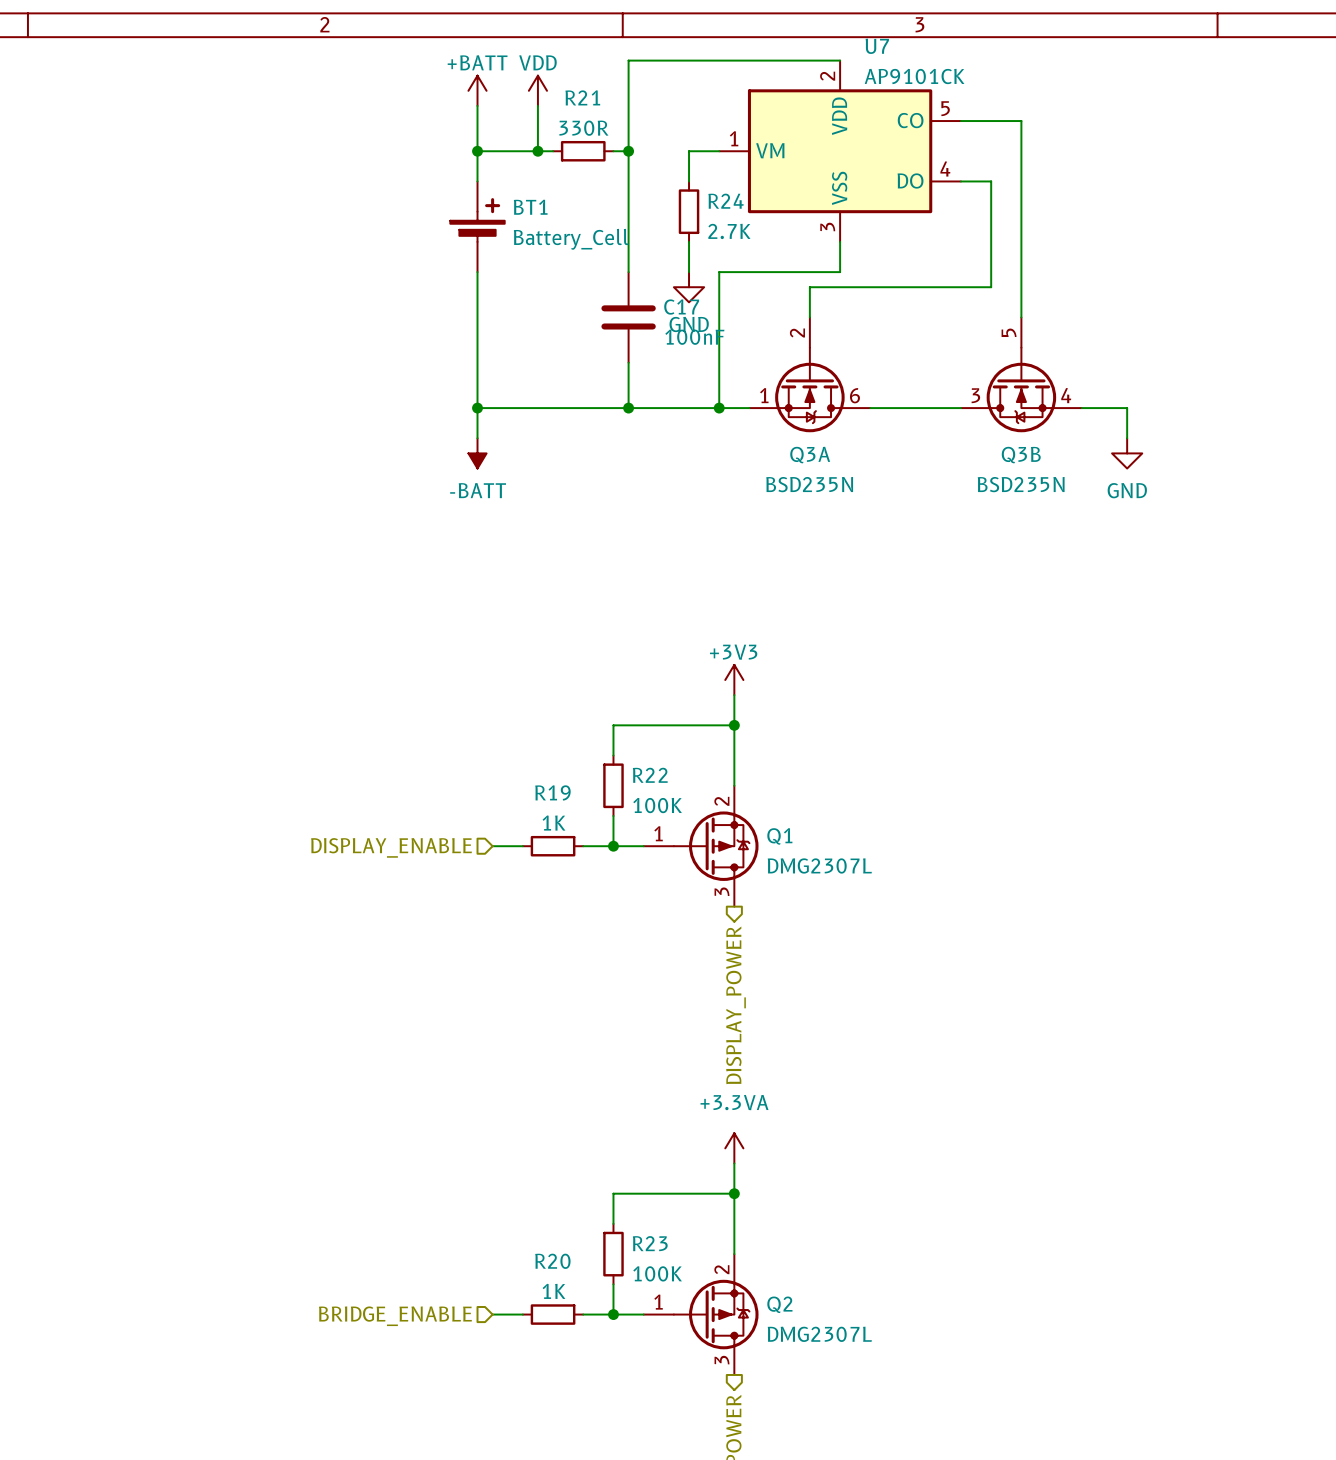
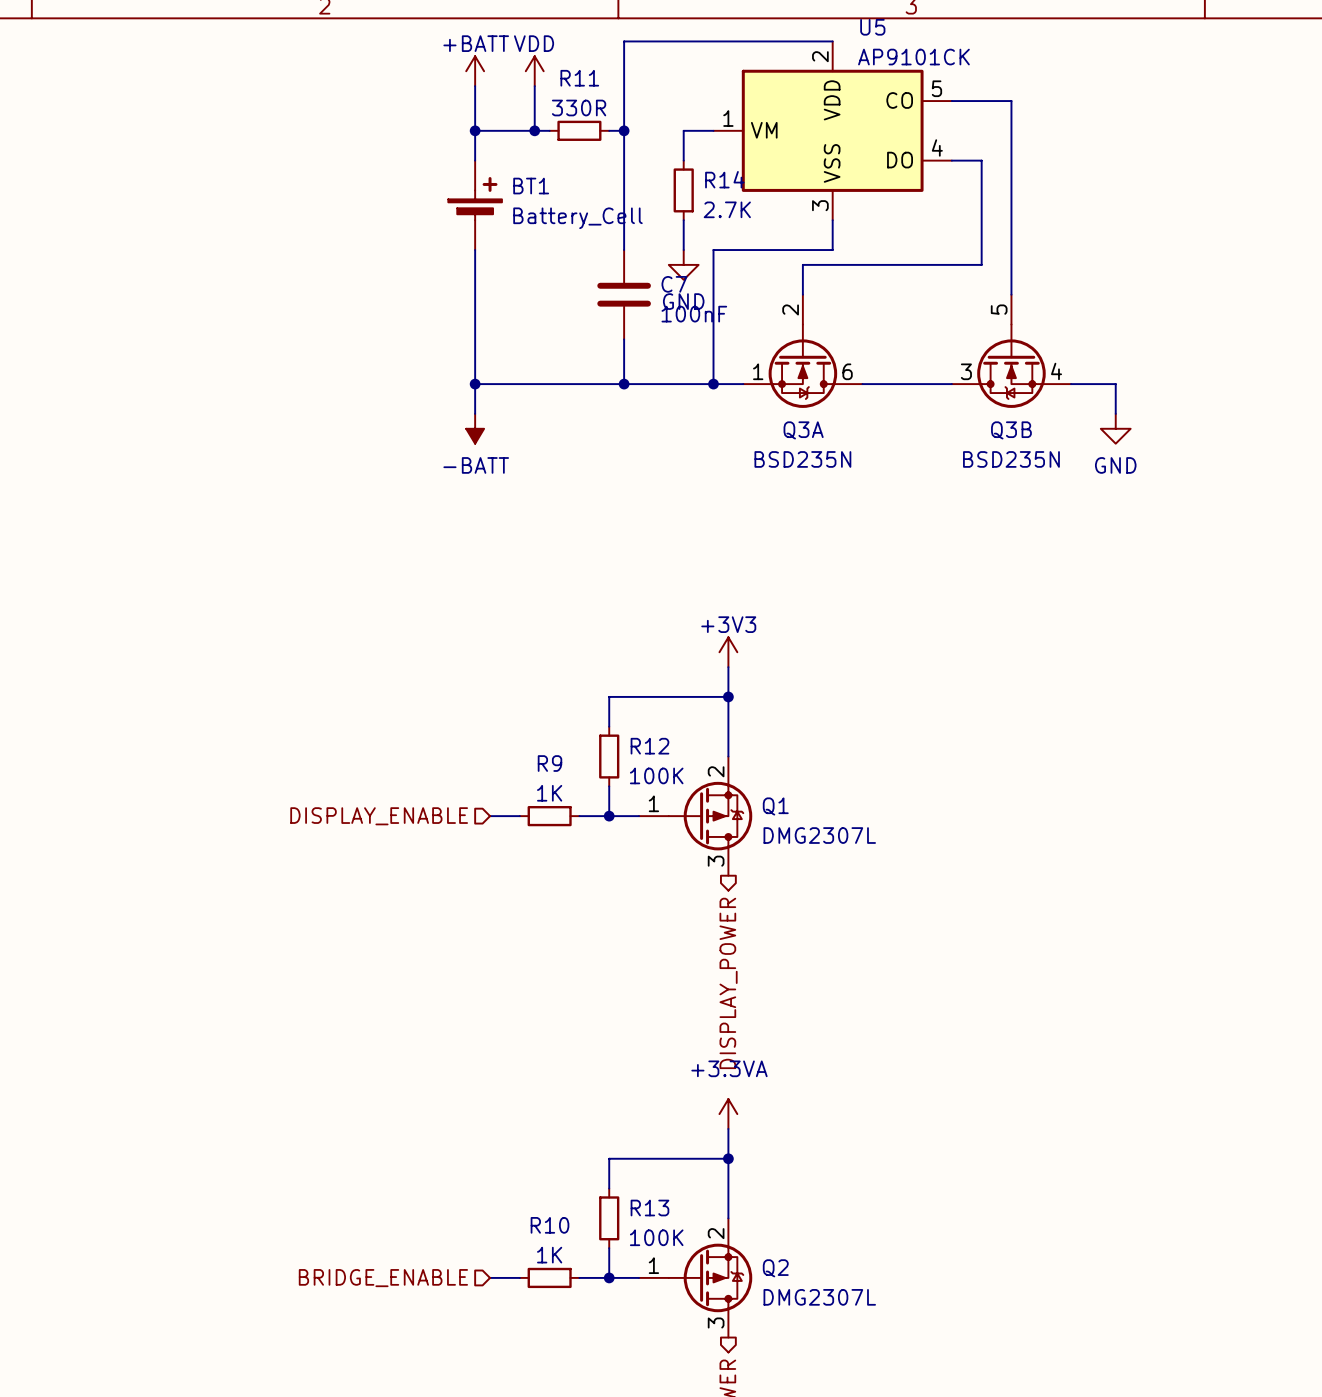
U7 name: U7 (877, 46) -> U5 (872, 27)
R21 name: R21 (582, 97) -> R11 (579, 78)
R24 name: R24 (726, 201) -> R14 (724, 179)
C17 name: C17 (681, 307) -> C7 (674, 284)
R22 name: R22 (650, 775) -> R12 (649, 746)
R19 name: R19 (552, 792) -> R9 (549, 763)
R23 name: R23 (650, 1243) -> R13 (649, 1208)
R20 name: R20 (552, 1261) -> R10 (549, 1225)

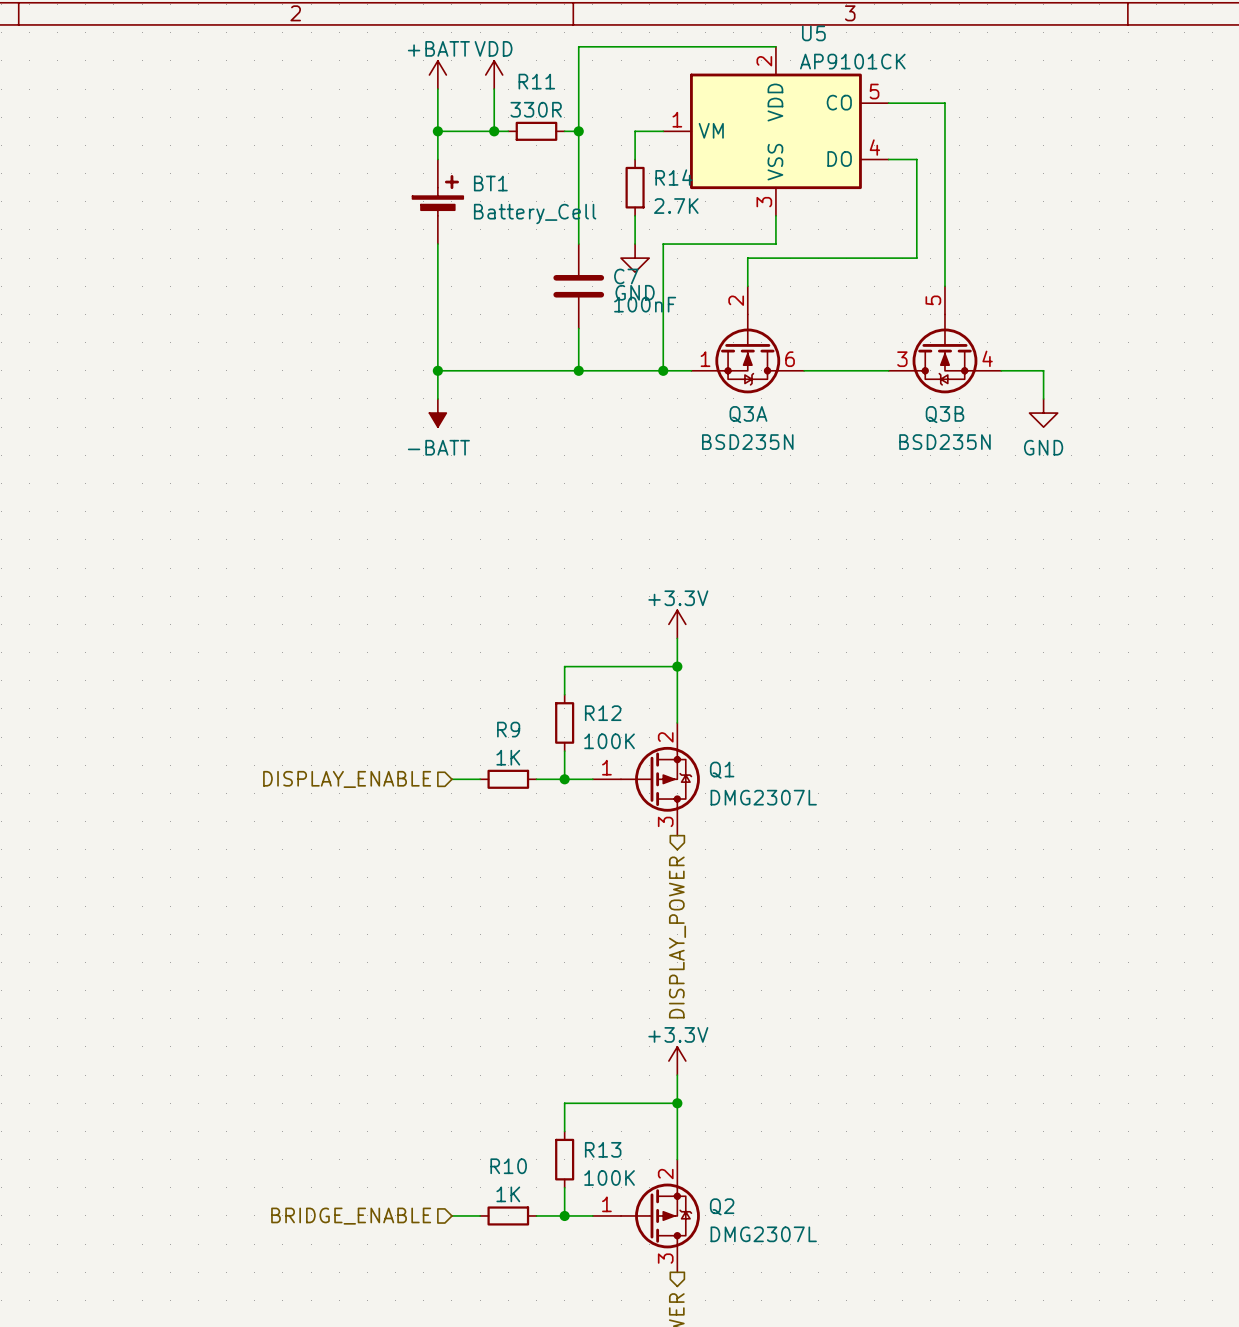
power symbol: +3V3 (728, 652) -> +3.3V (677, 624)
power symbol: +3.3VA (728, 1114) -> +3.3V (677, 1061)

